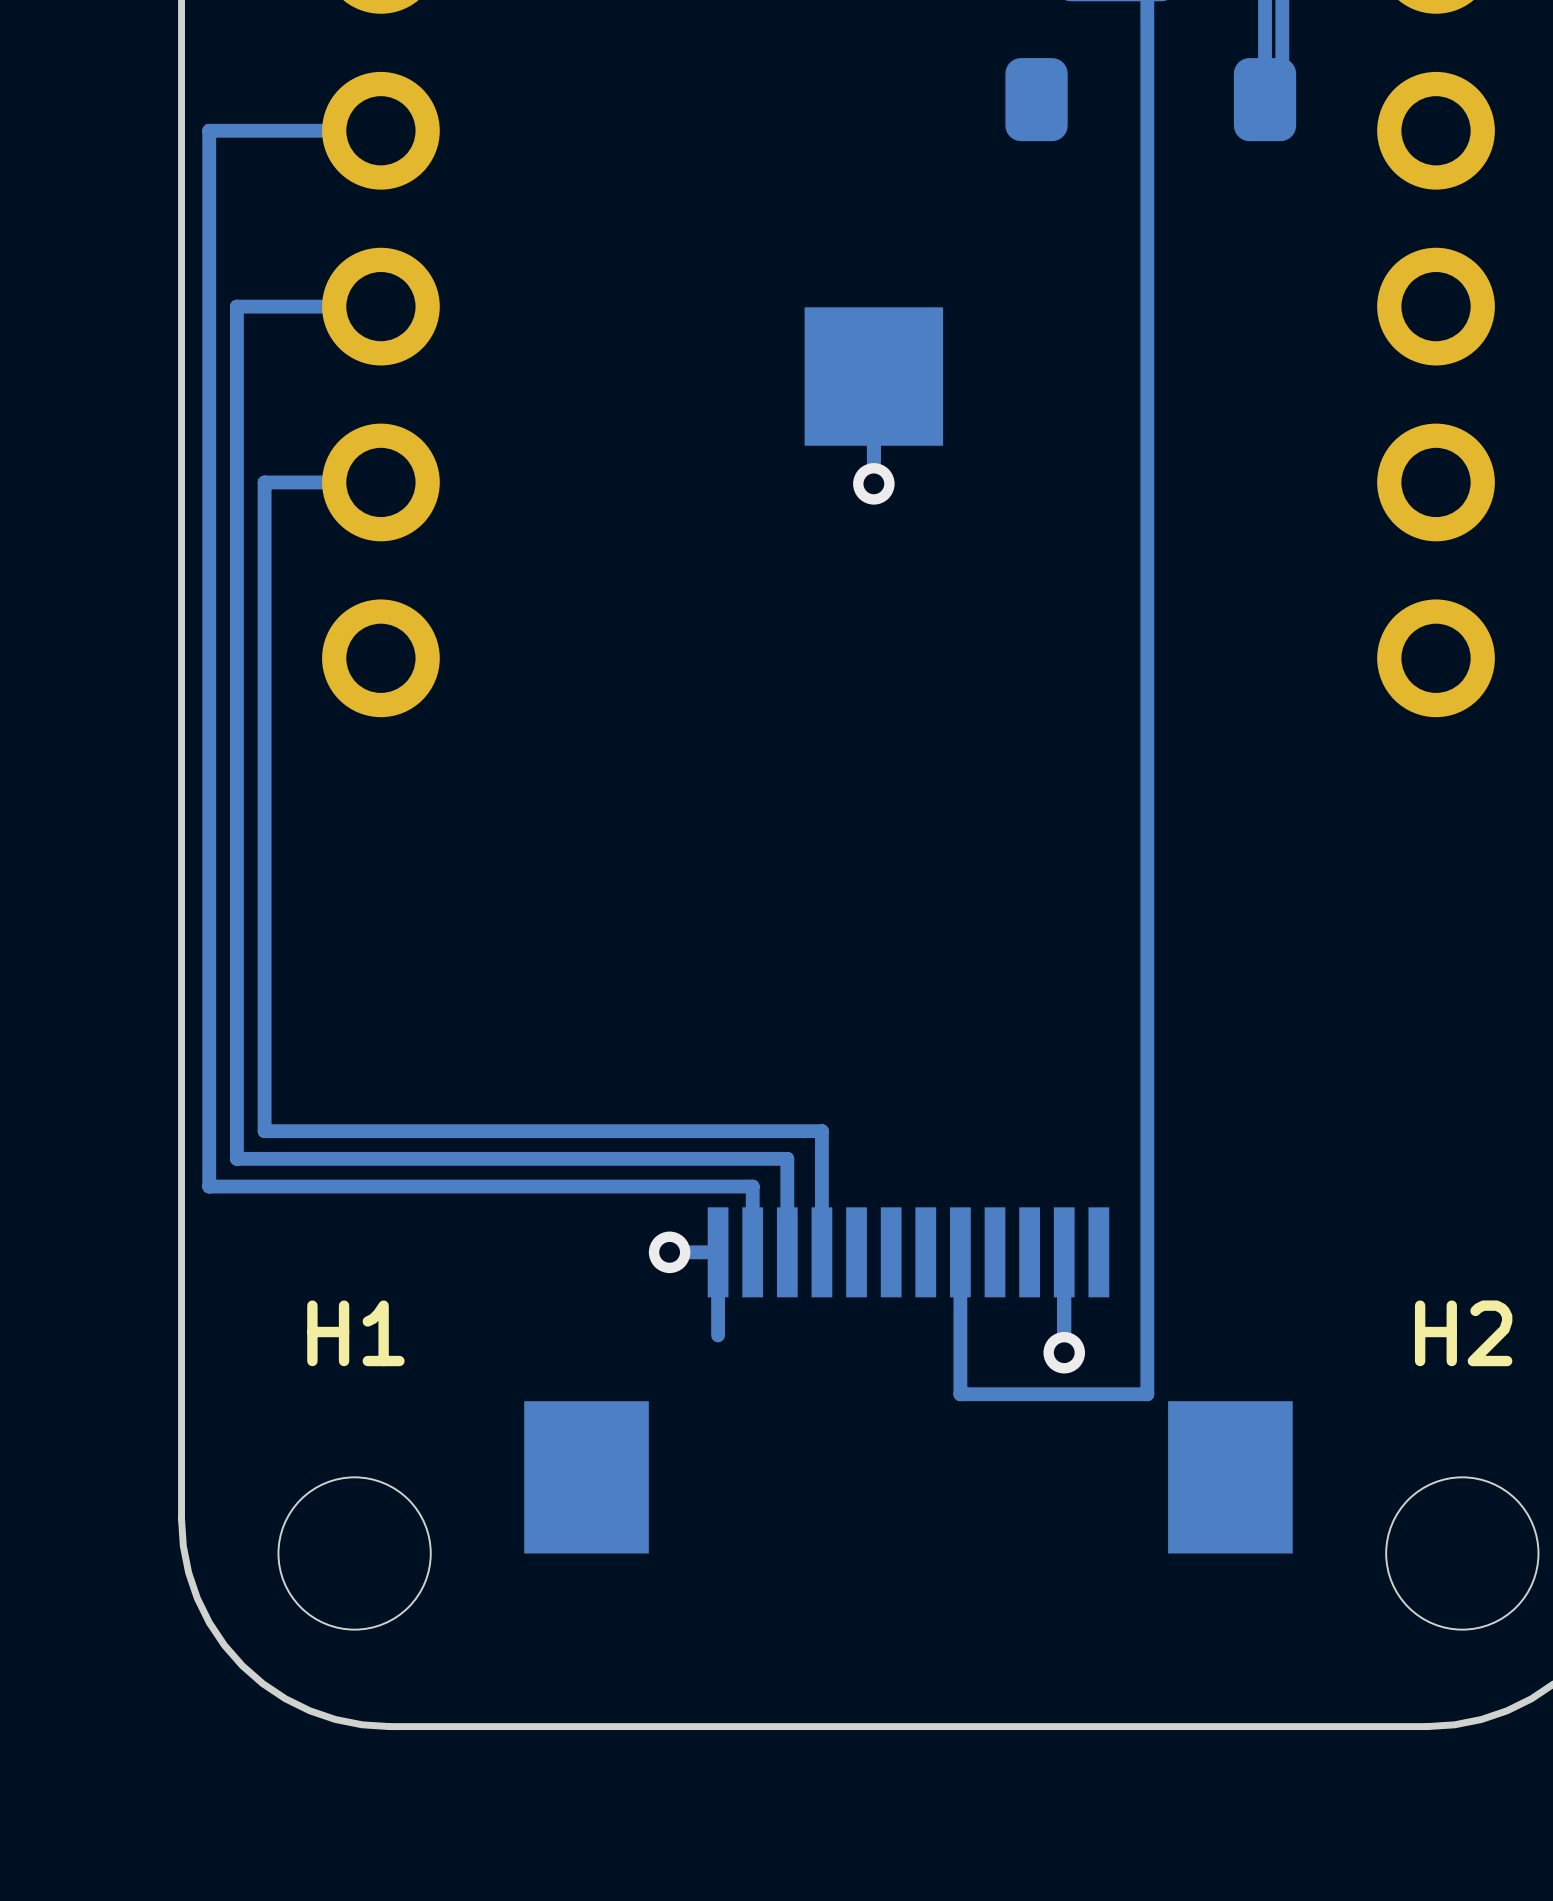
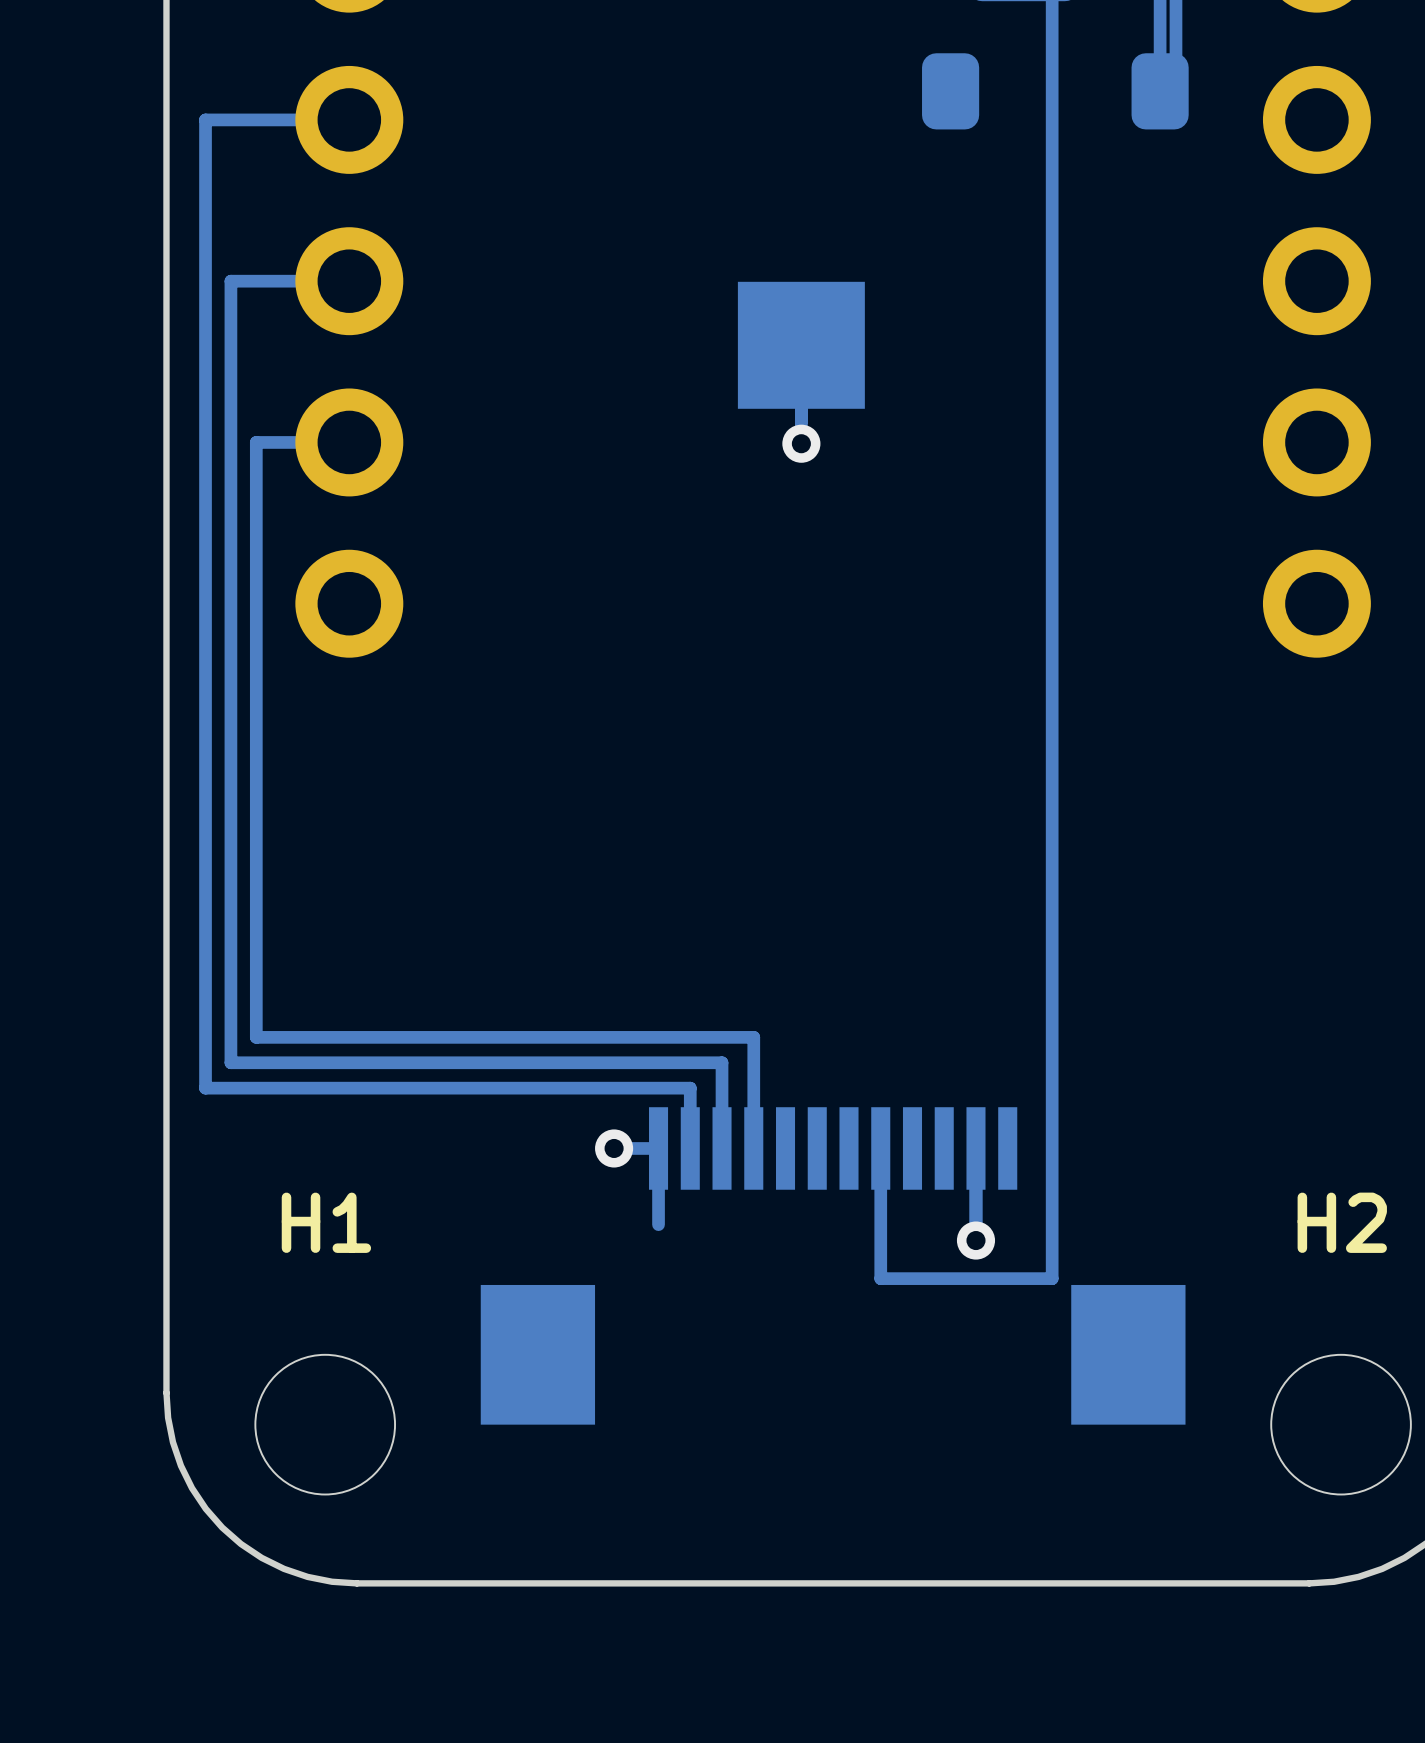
bottom track: (224, 130) (209, 130) (209, 1186) (224, 1186) -> (205, 119) (205, 1088)
bottom track: (251, 306) (236, 306) (236, 1158) (251, 1158) -> (230, 281) (230, 1062)
bottom track: (279, 482) (264, 482) (264, 1131) (279, 1131) -> (256, 442) (256, 1037)

